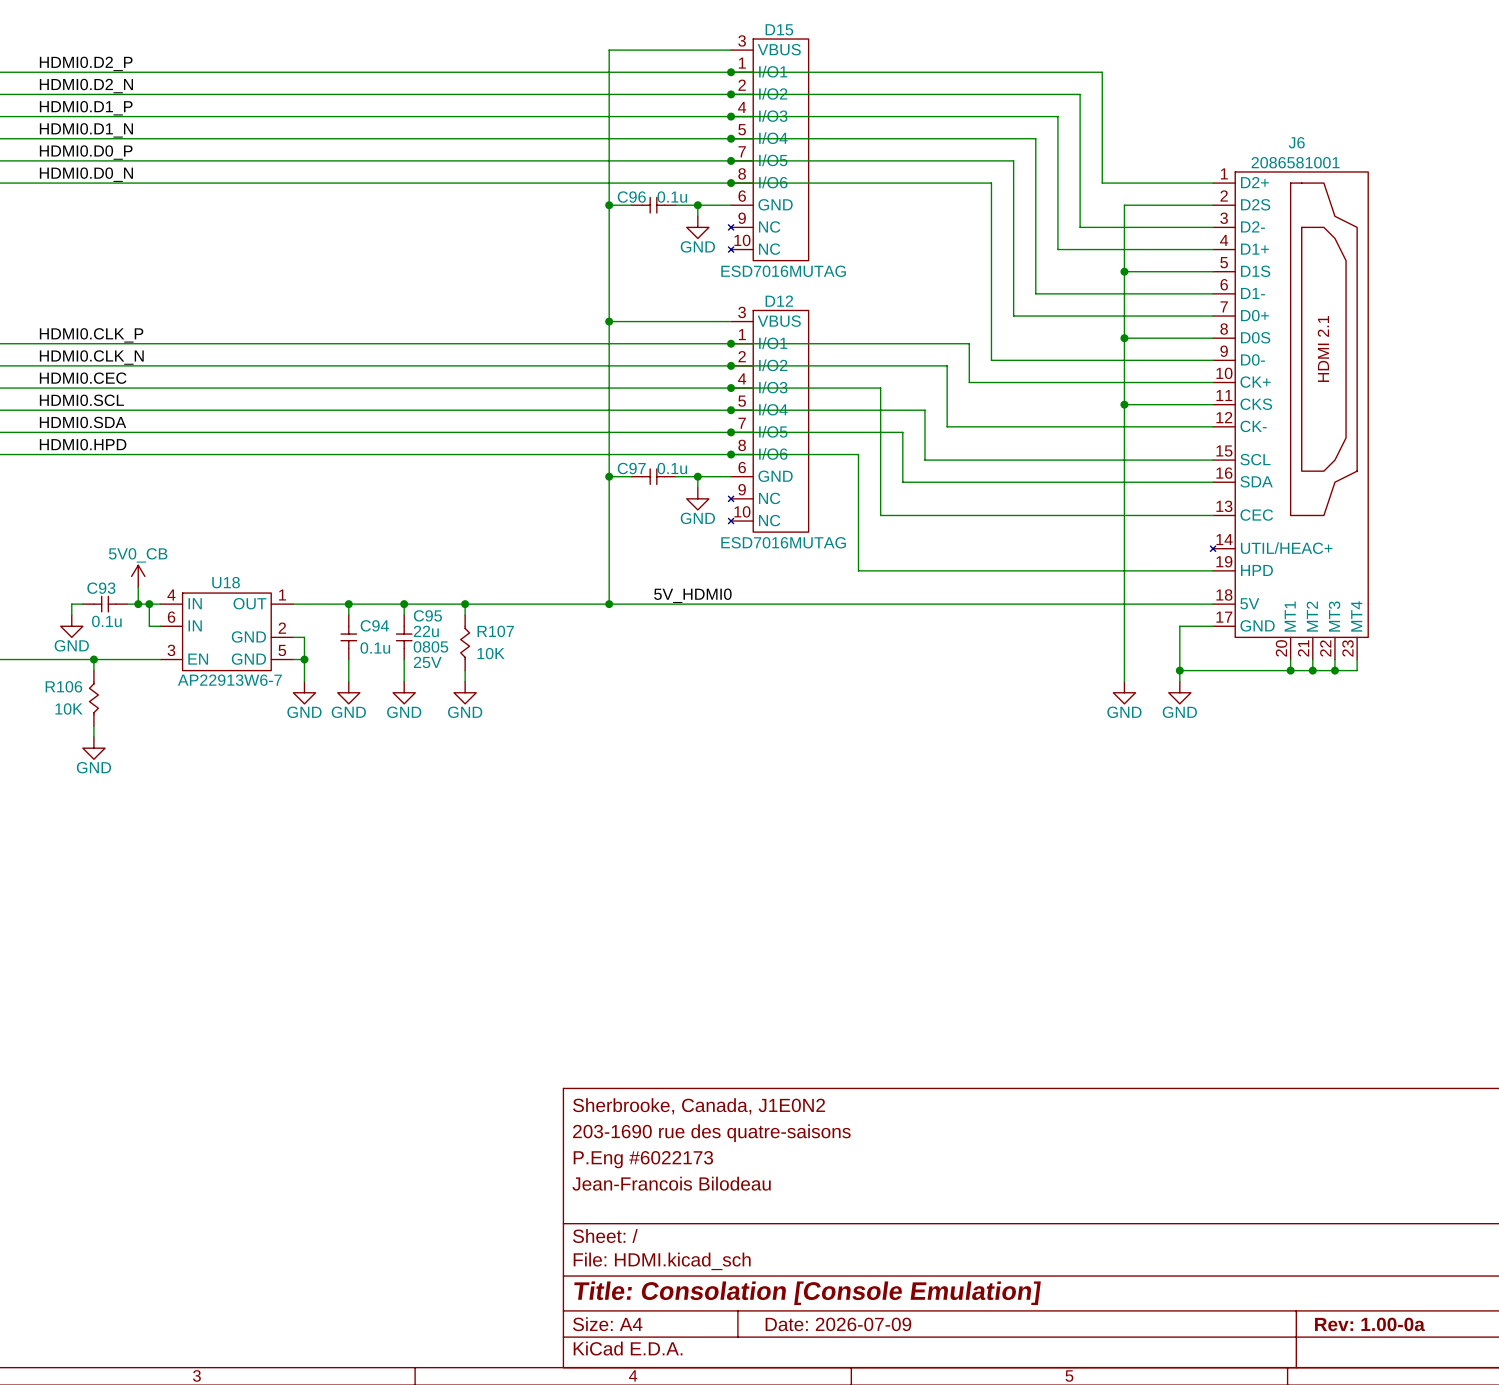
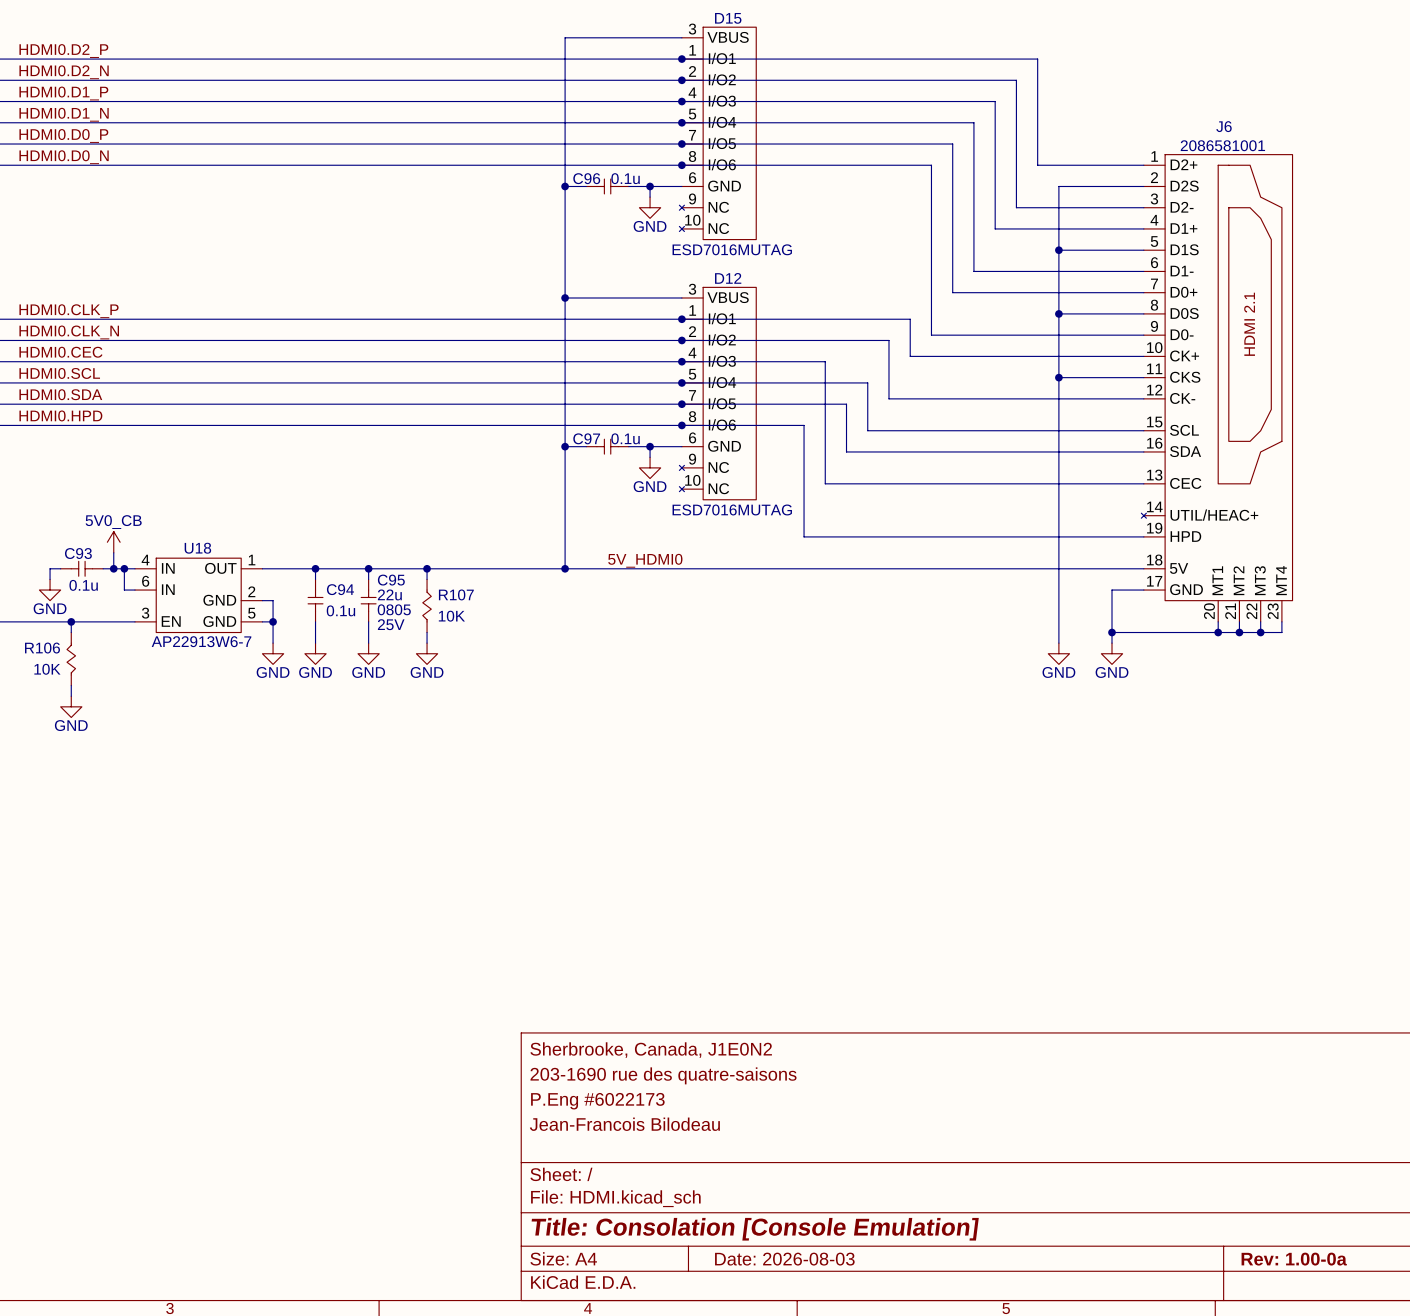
title block: Date: 2026-07-09 (838, 1324) -> Date: 2026-08-03 (784, 1259)

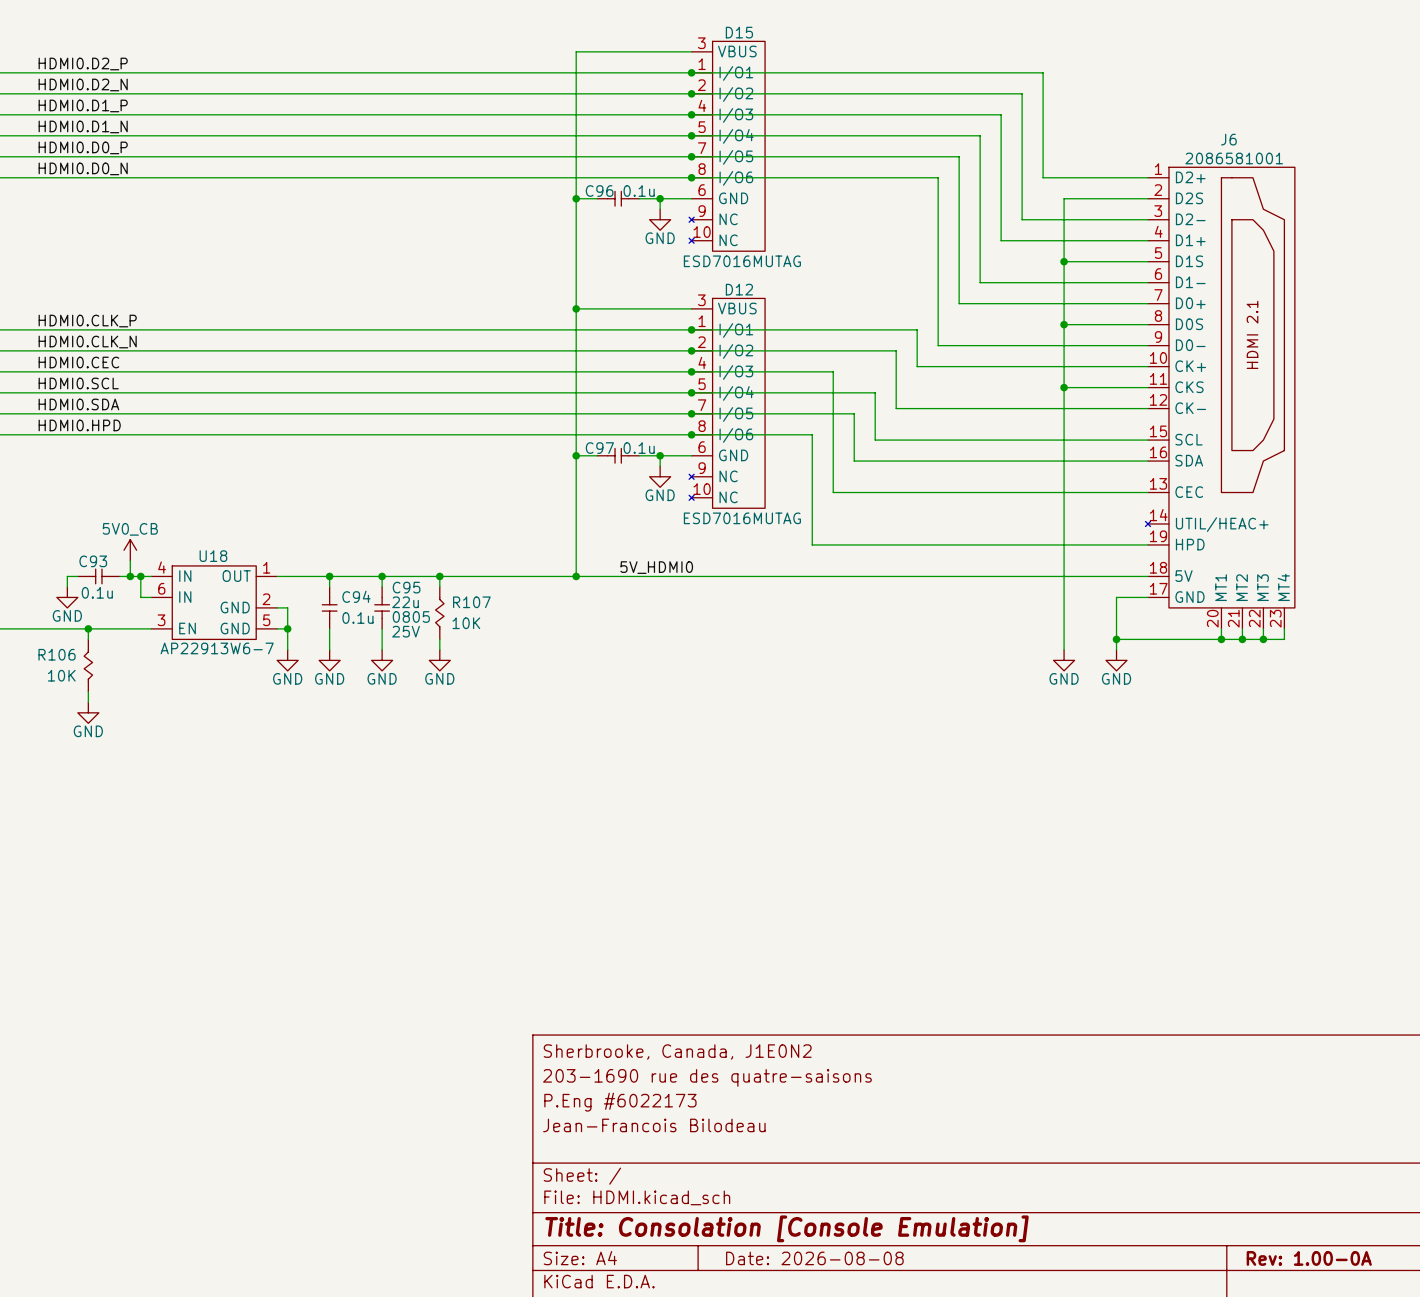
title block: Date: 2026-08-03 (784, 1259) -> Date: 2026-08-08 (814, 1258)
title block: Rev: 1.00-0a (1294, 1259) -> Rev: 1.00-0A (1309, 1258)

